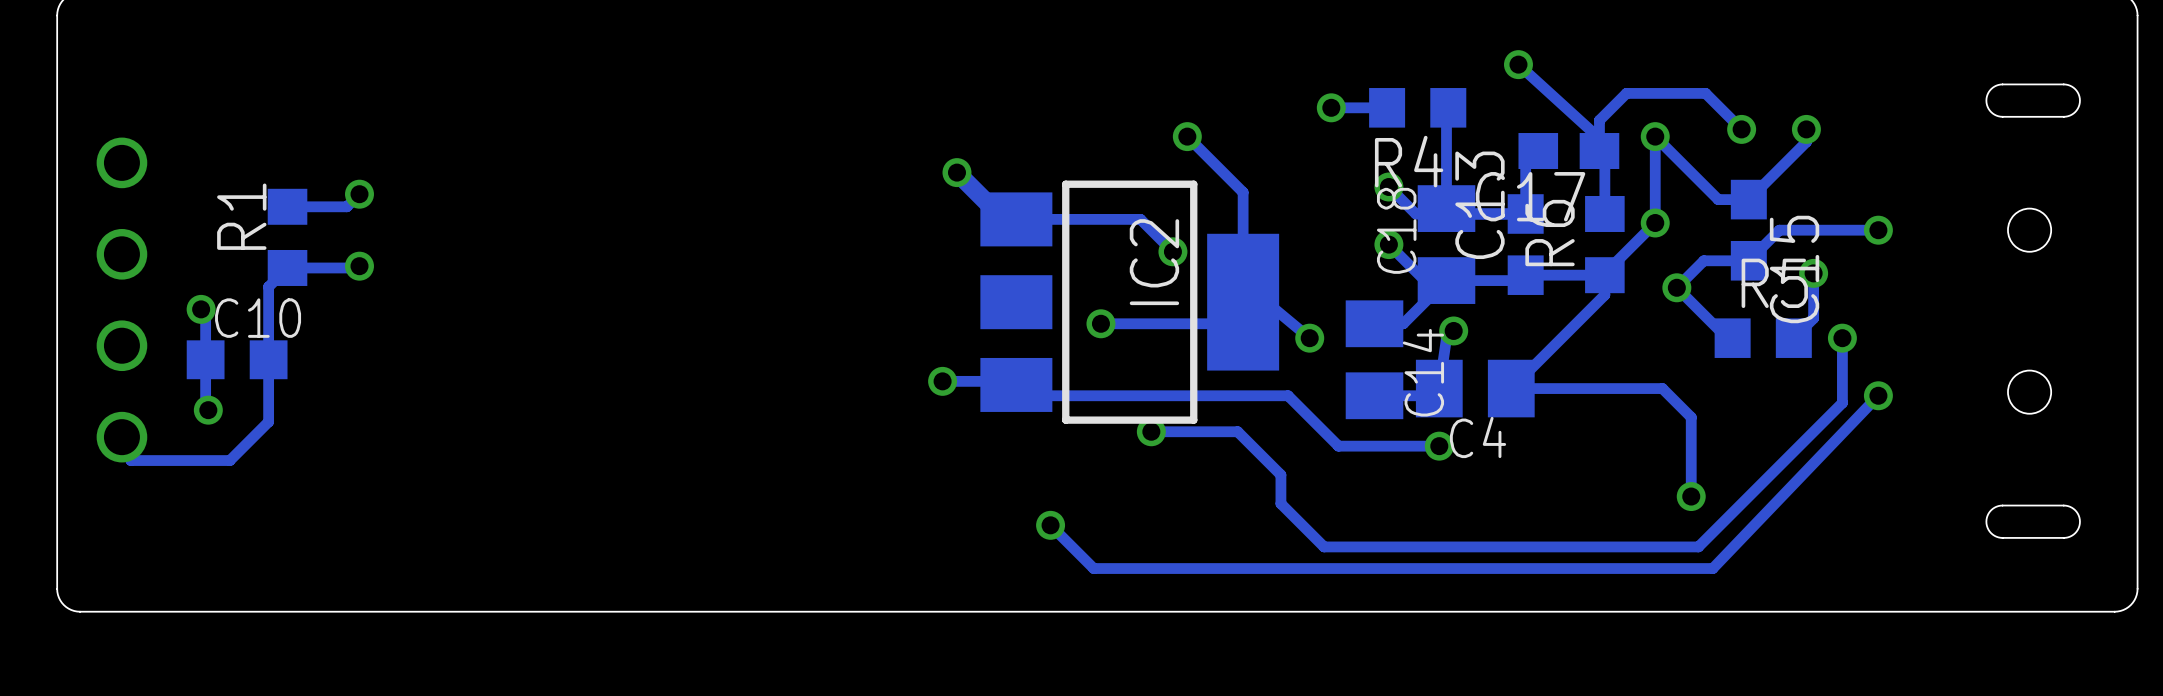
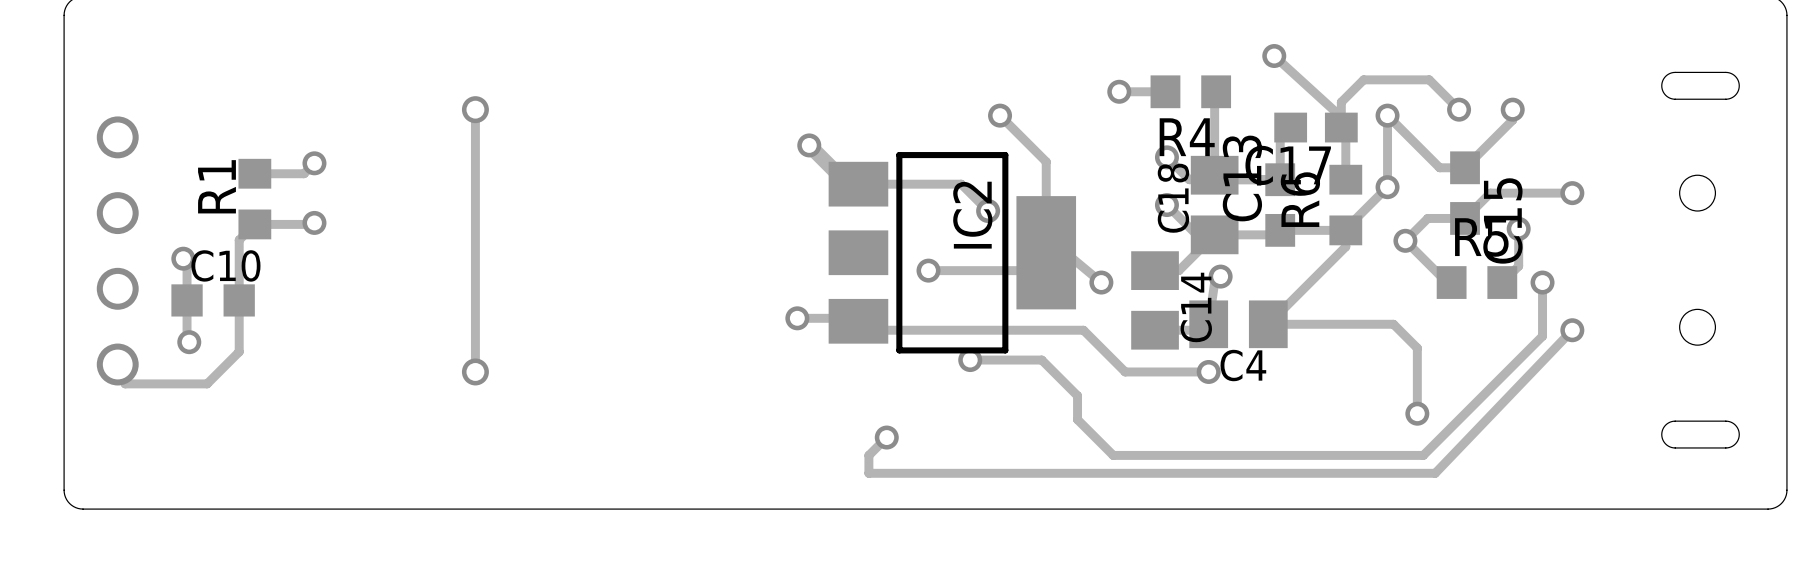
track: none -> (475, 109) (475, 371)
via: none -> (475, 109)
via: none -> (475, 371)
track: (1050, 525) (1093, 568) -> (886, 437) (868, 455) (868, 473) (922, 473)

